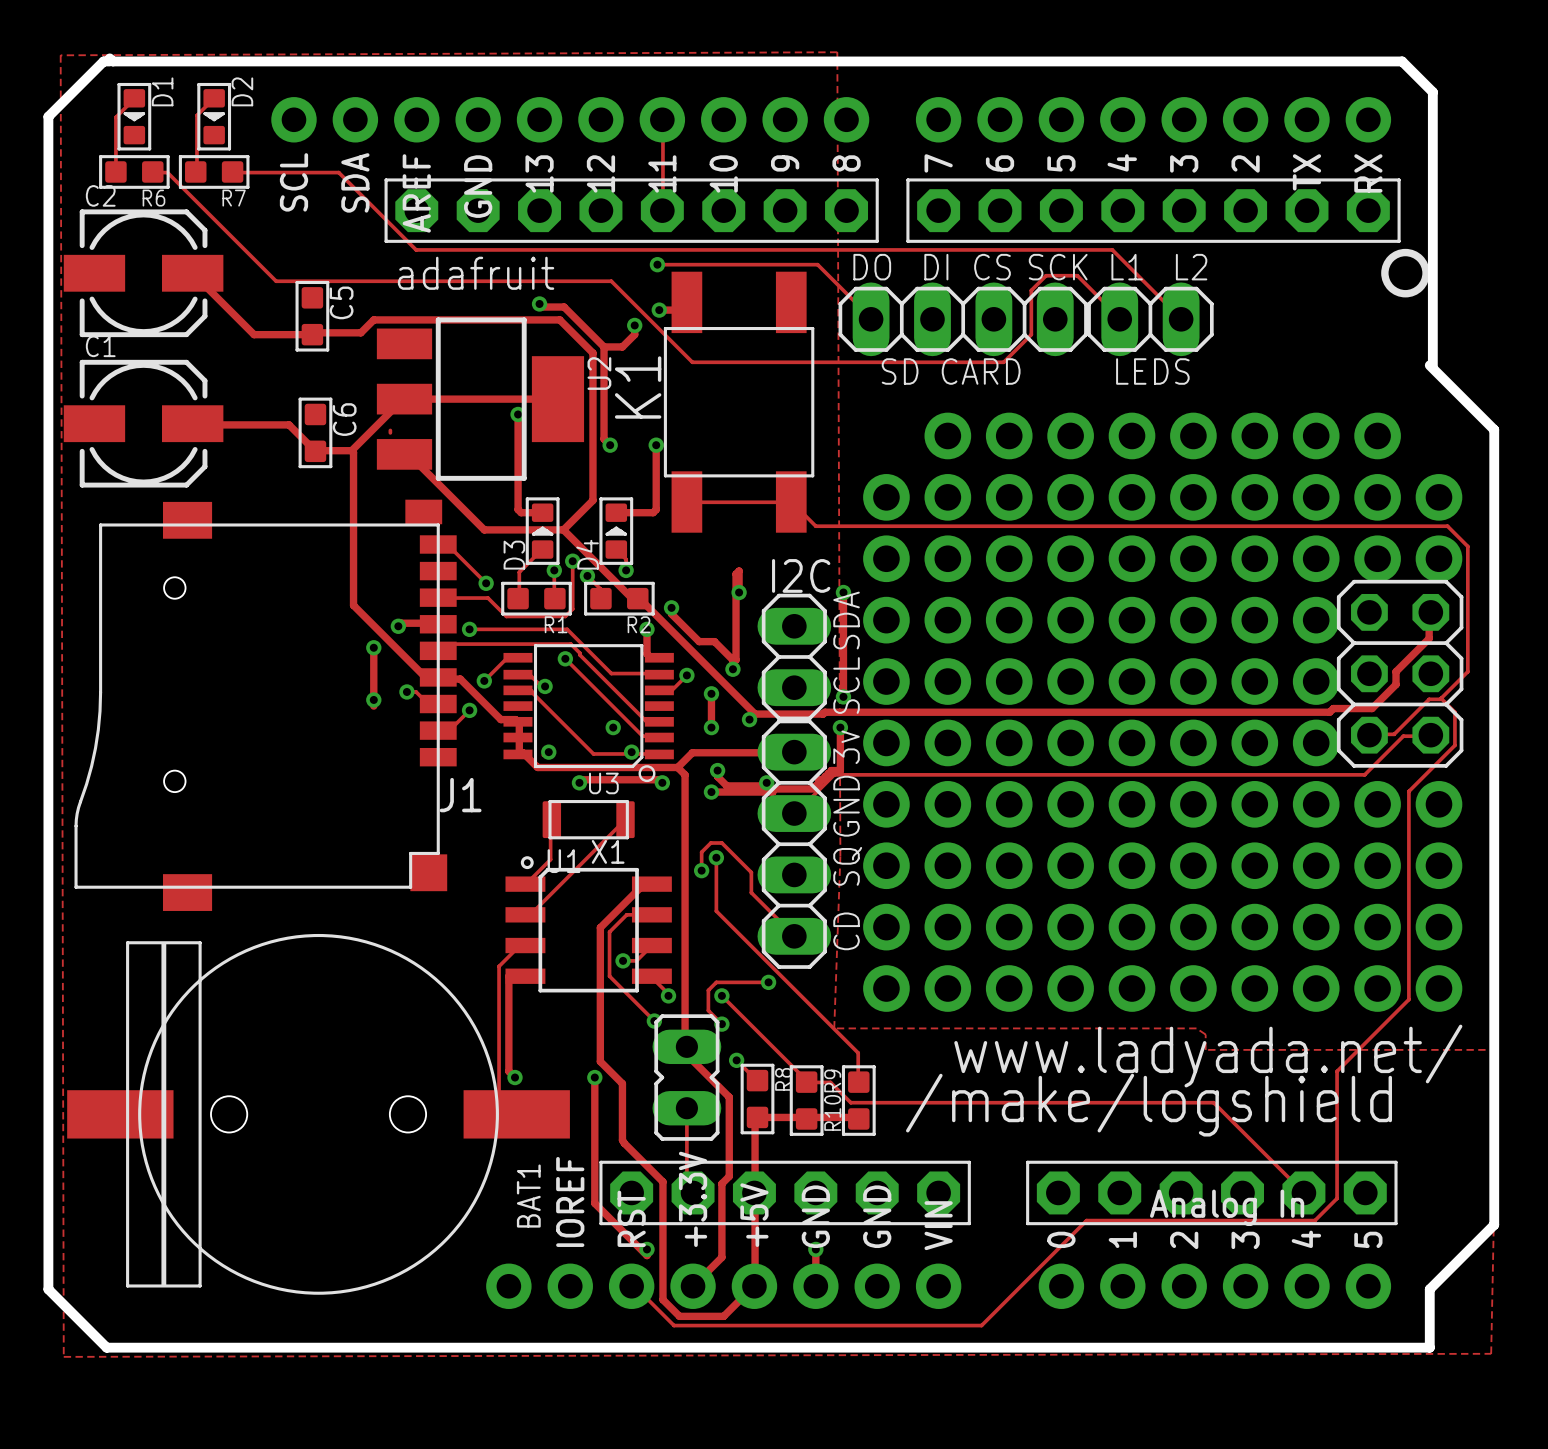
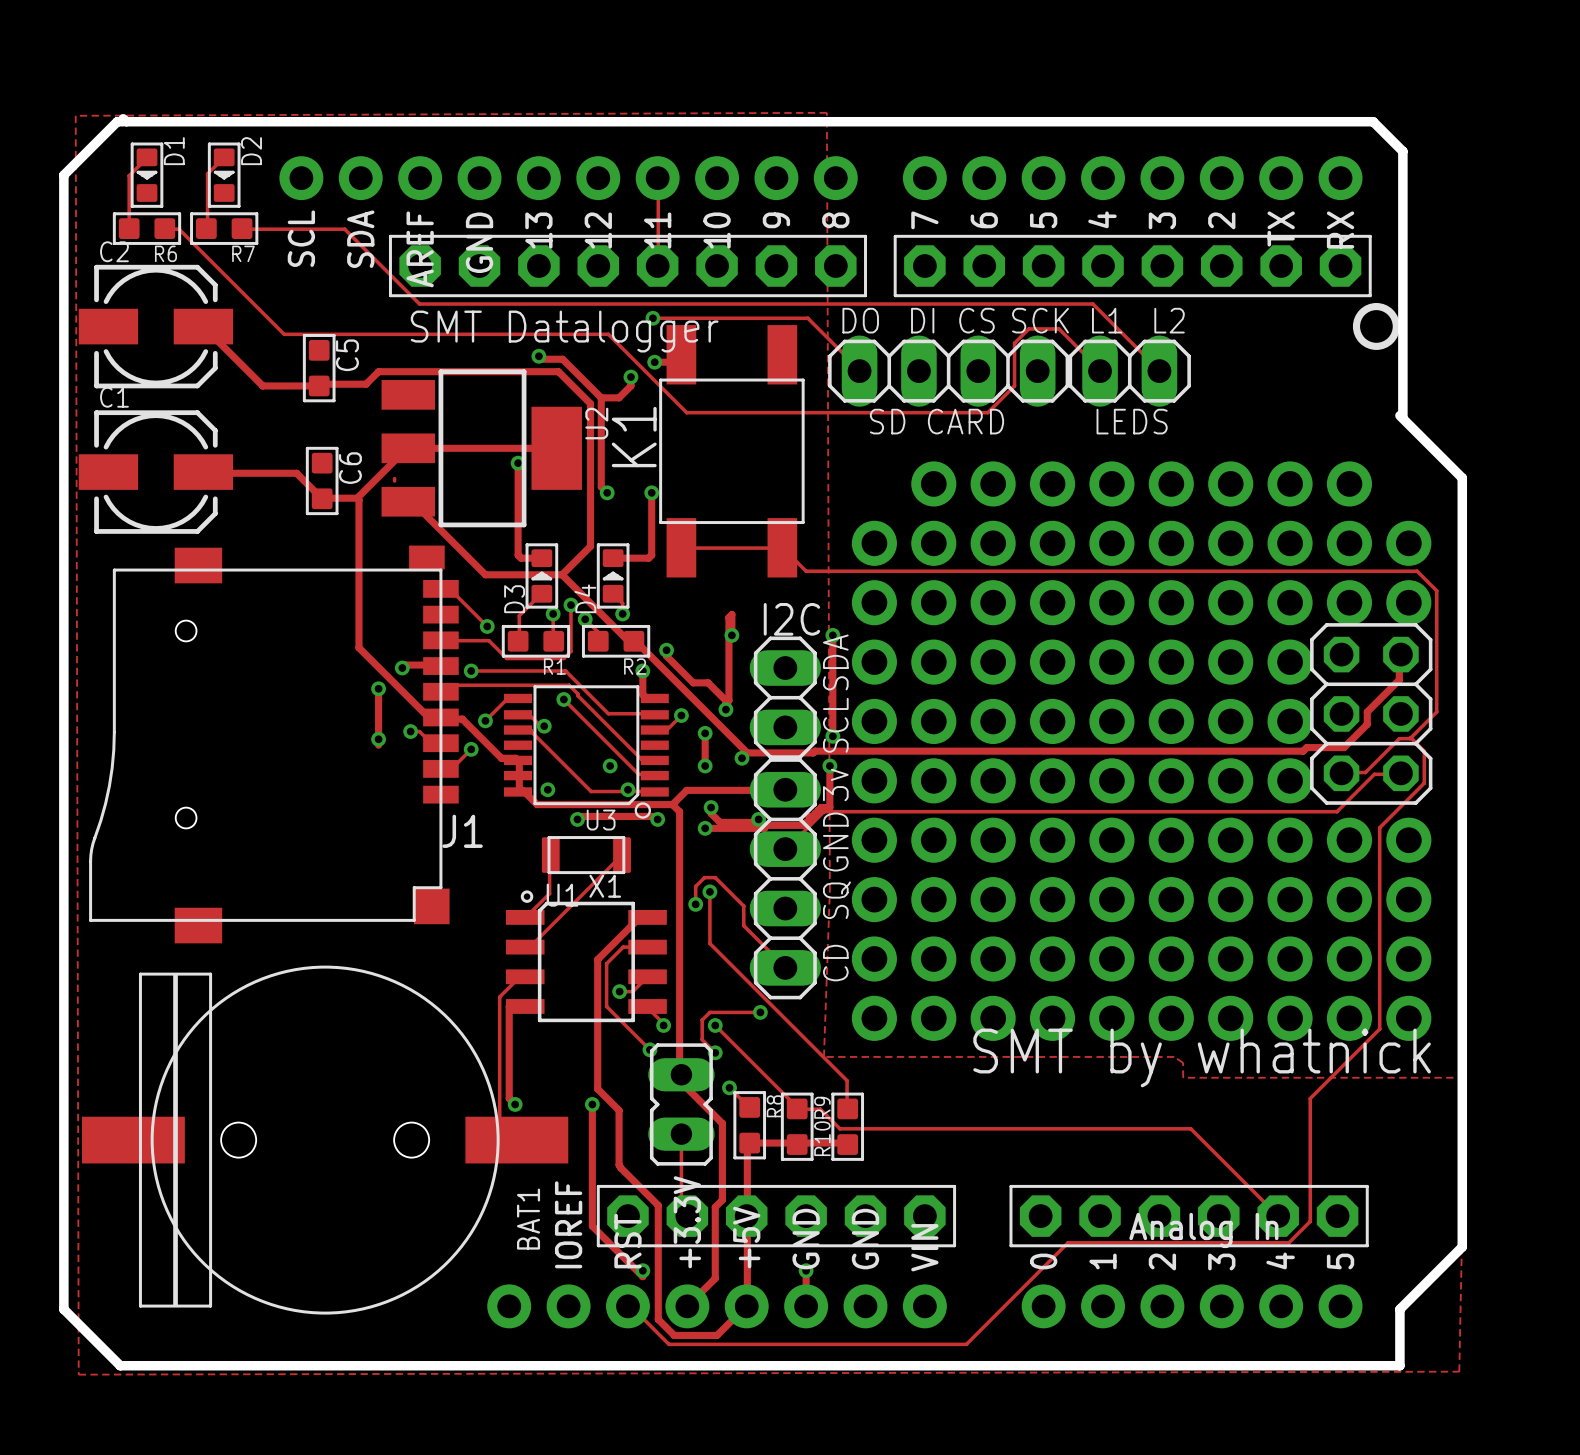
text: adafruit (476, 273) -> SMT Datalogger (564, 331)
text: none -> SMT by whatnick (1202, 1057)
text: www.ladyada.net/ (1208, 1056) -> none
text: /make/logshield (1149, 1105) -> none

